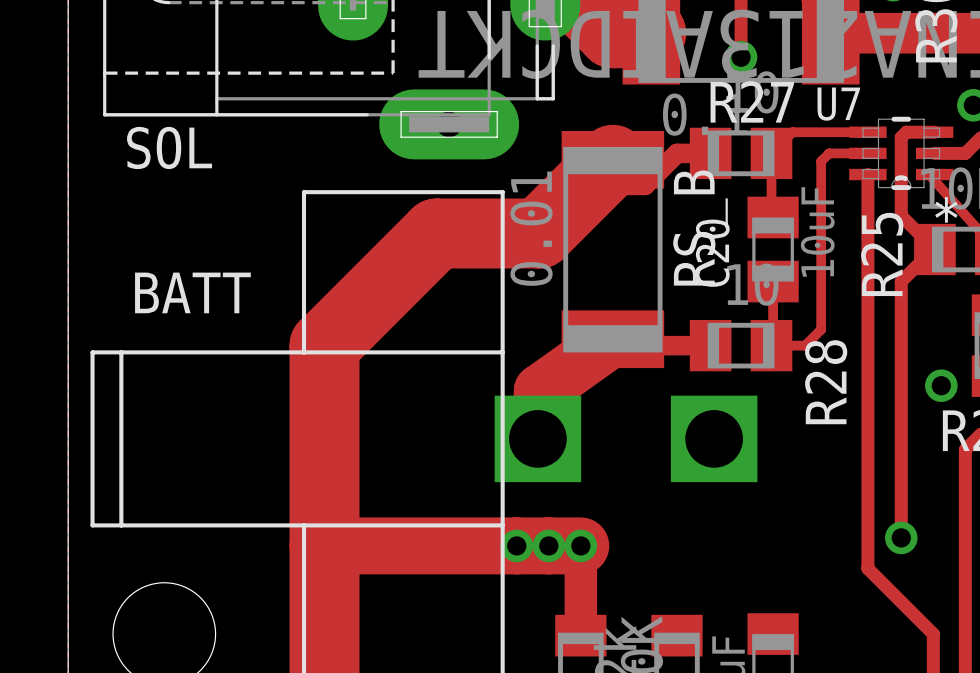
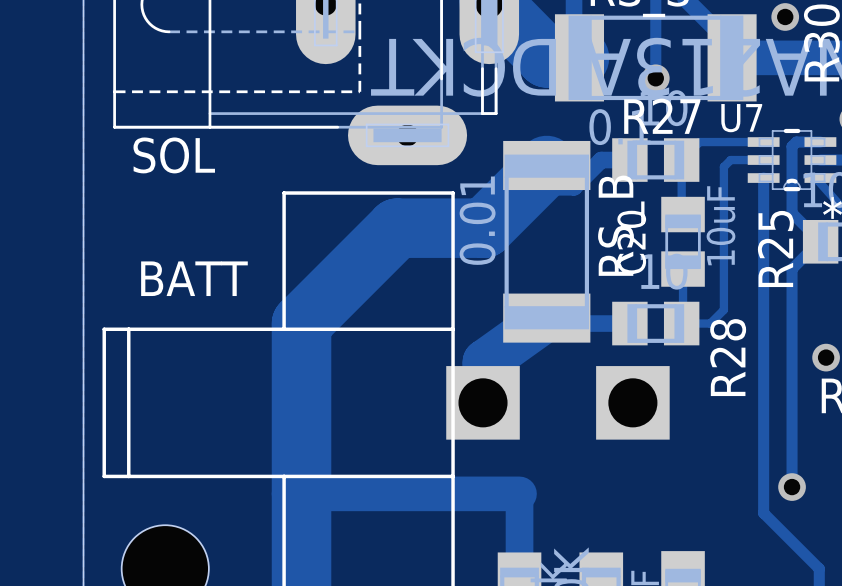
track width: thick (324, 545) (580, 545) -> thin (301, 493) (519, 493)
via: (516, 545) -> none
via: (548, 545) -> none
via: (580, 545) -> none

